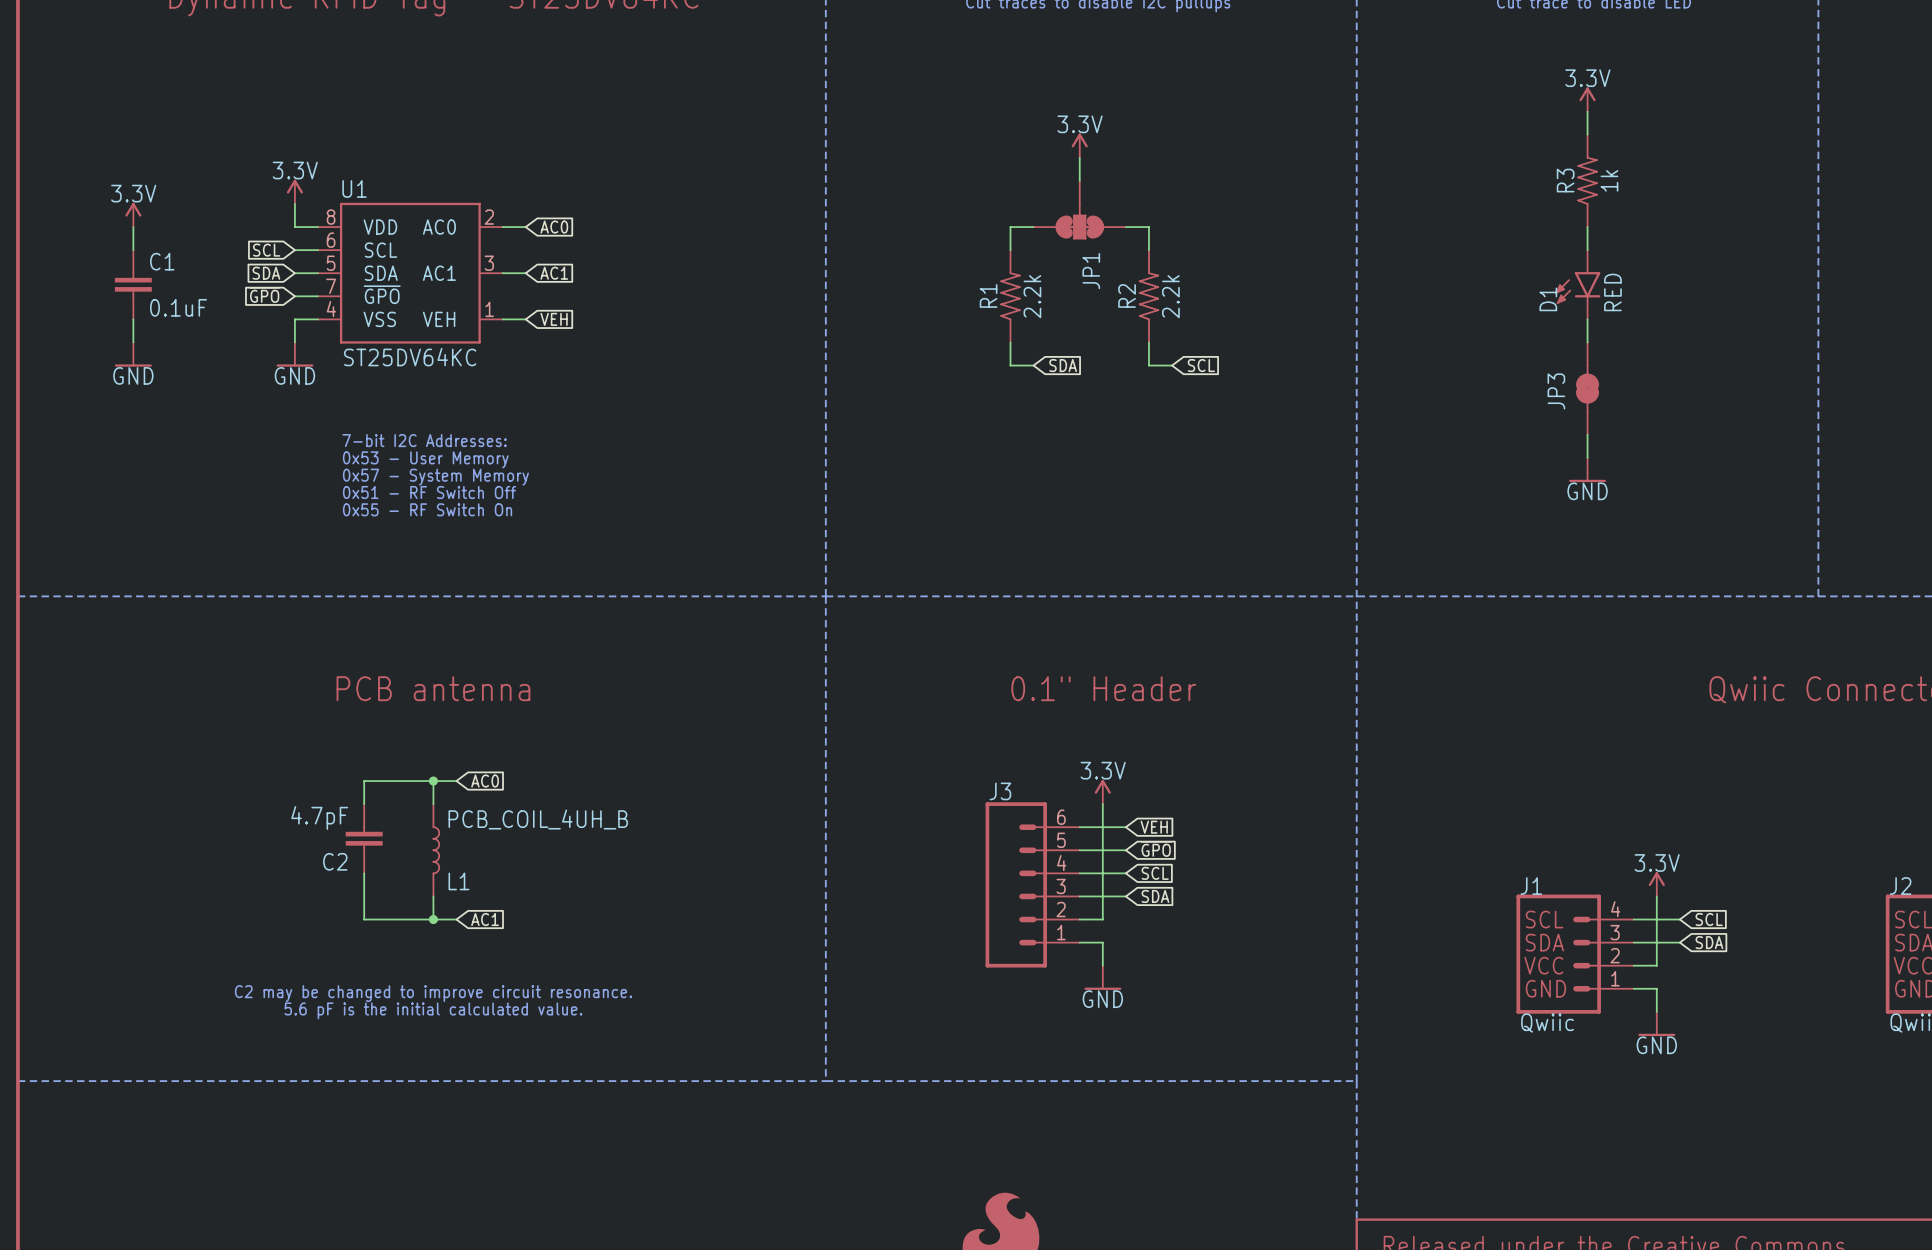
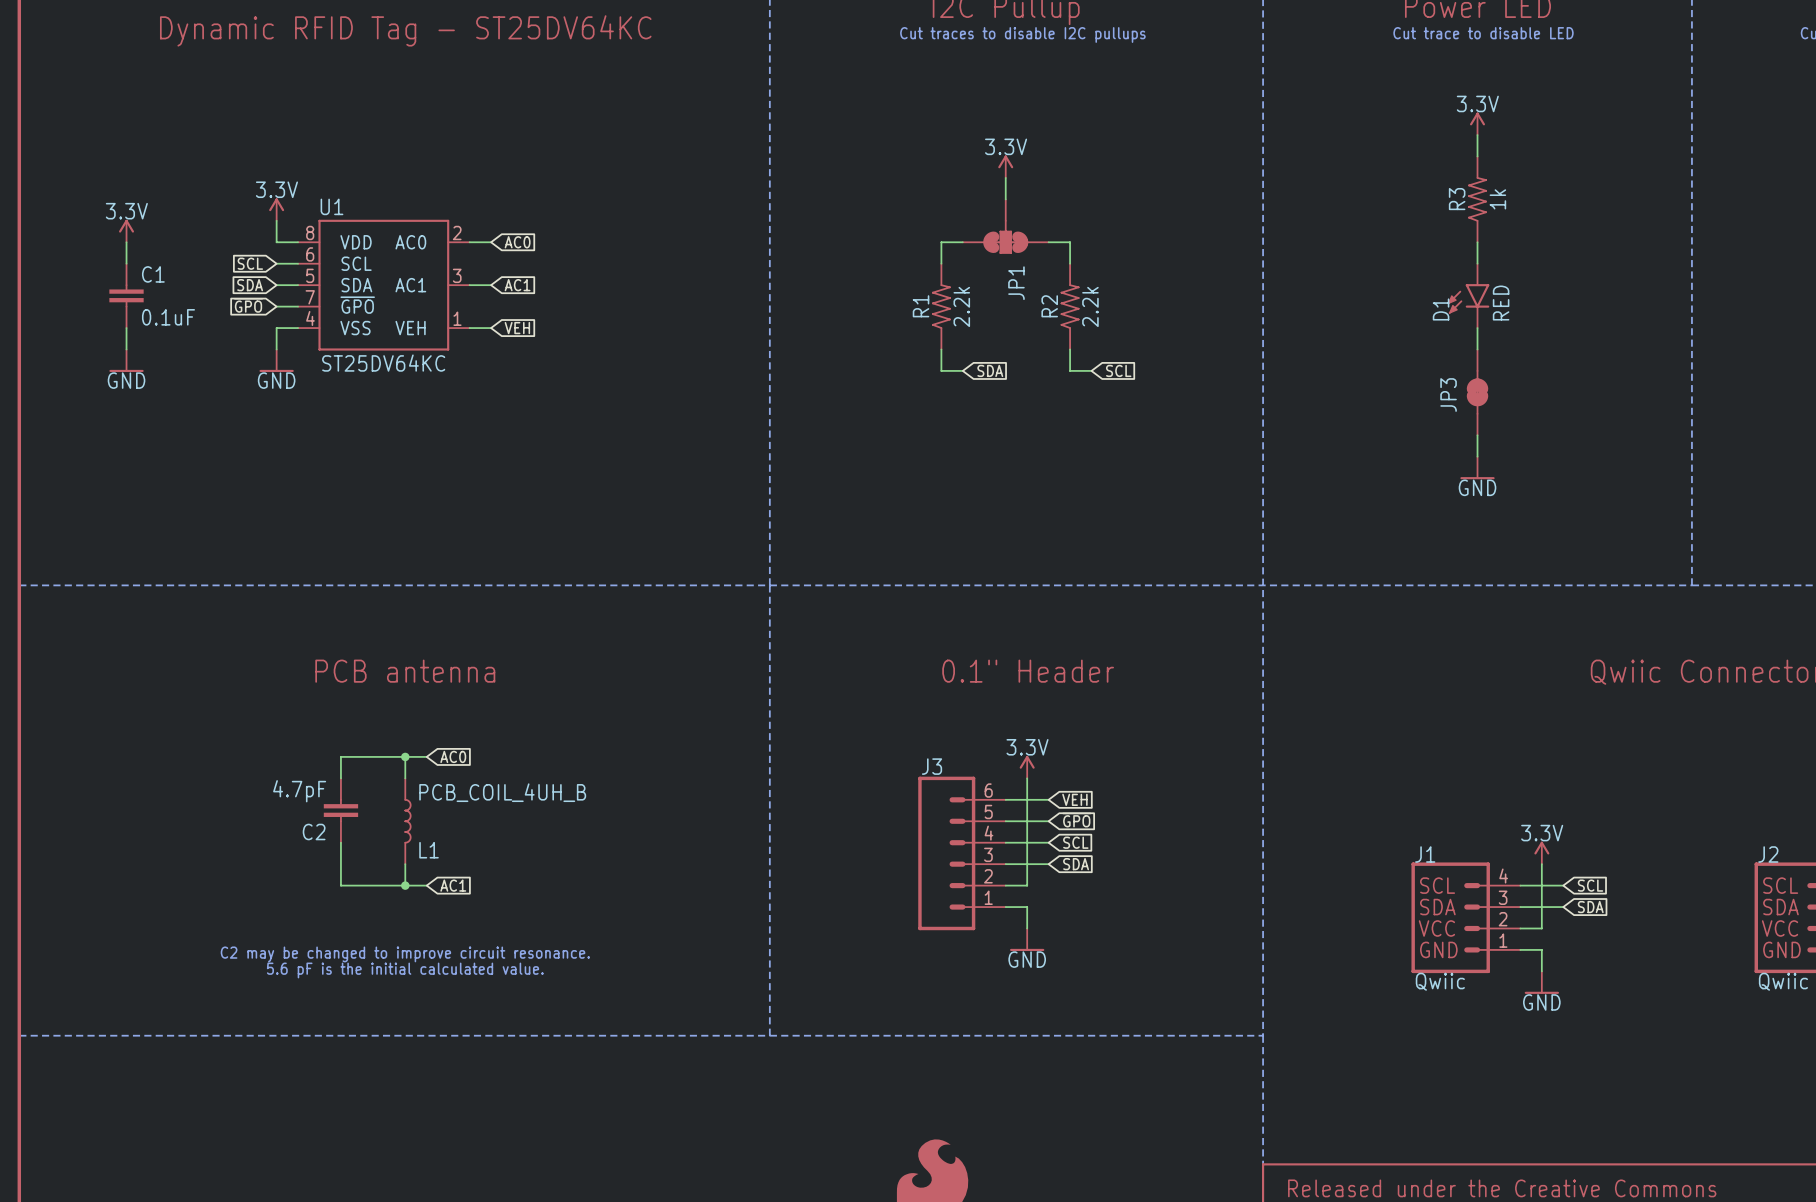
text: 7-bit I2C Addresses: (424, 440) -> none
text: 0x53 - User Memory (425, 459) -> none
text: 0x57 - System Memory (435, 477) -> none
text: 0x51 - RF Switch Off (429, 492) -> none
text: 0x55 - RF Switch On (427, 509) -> none

